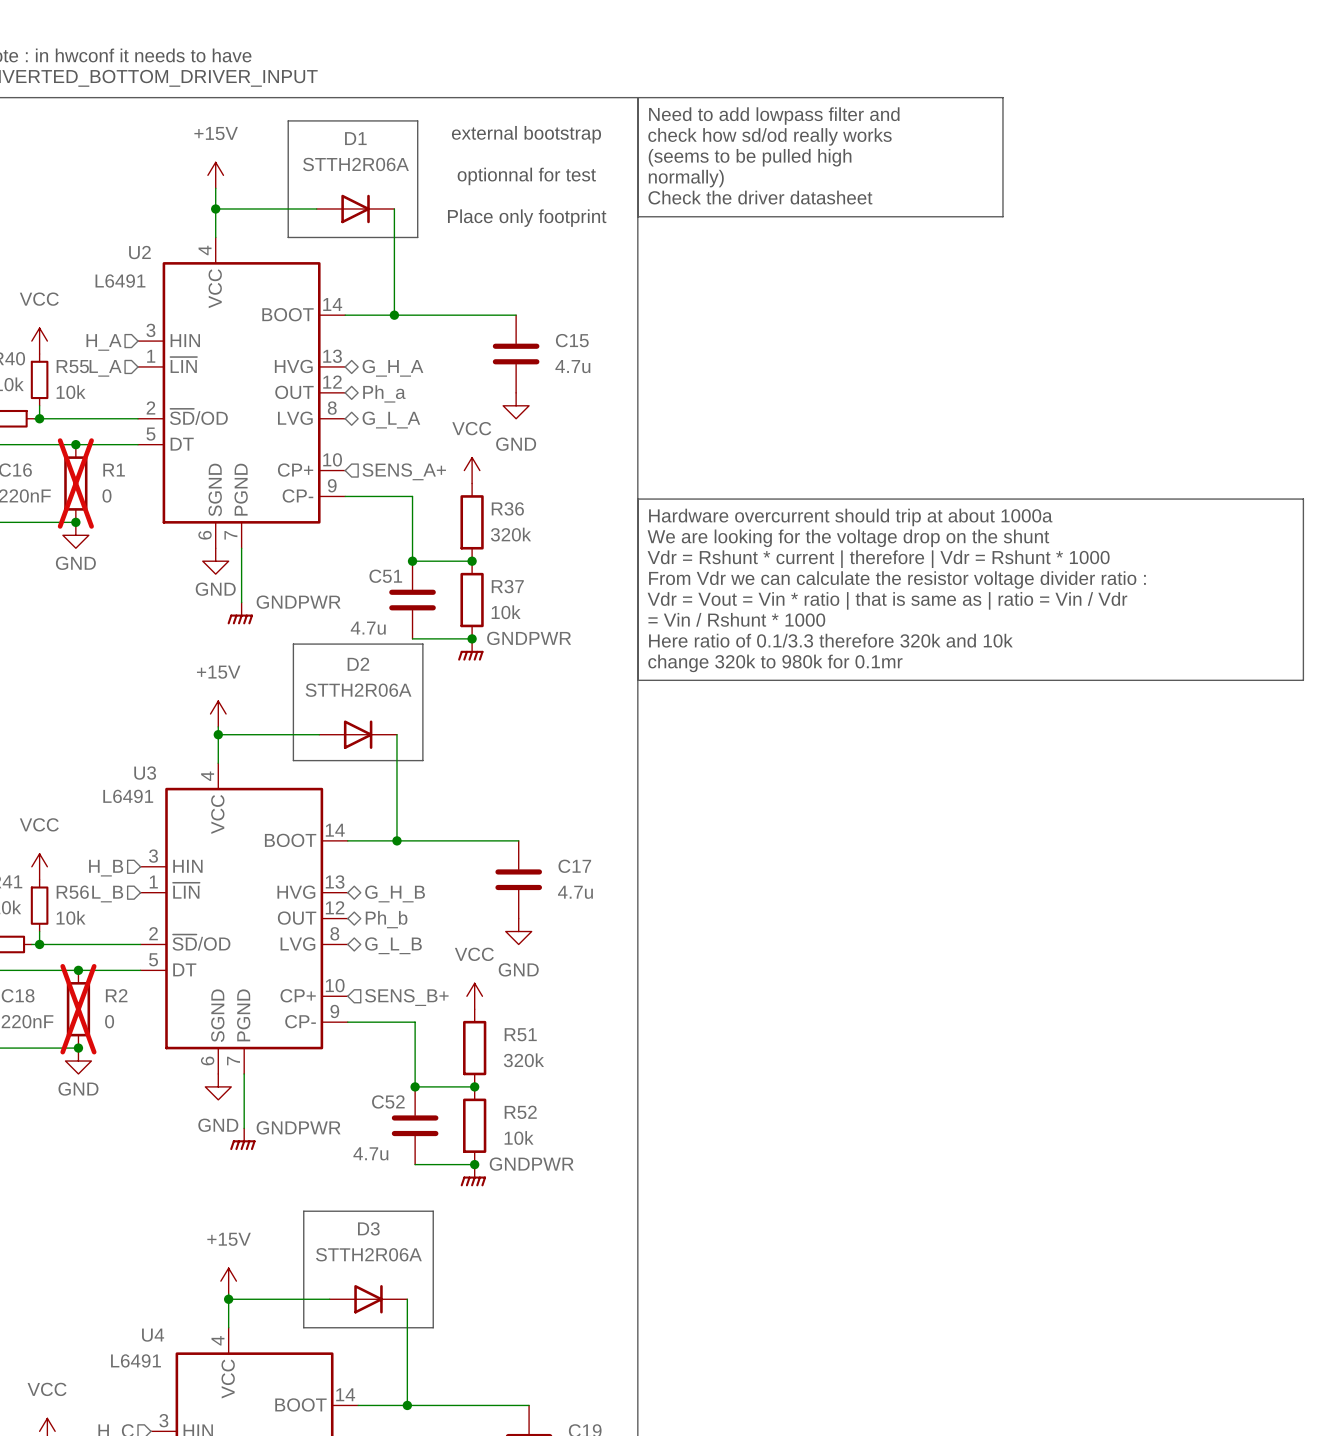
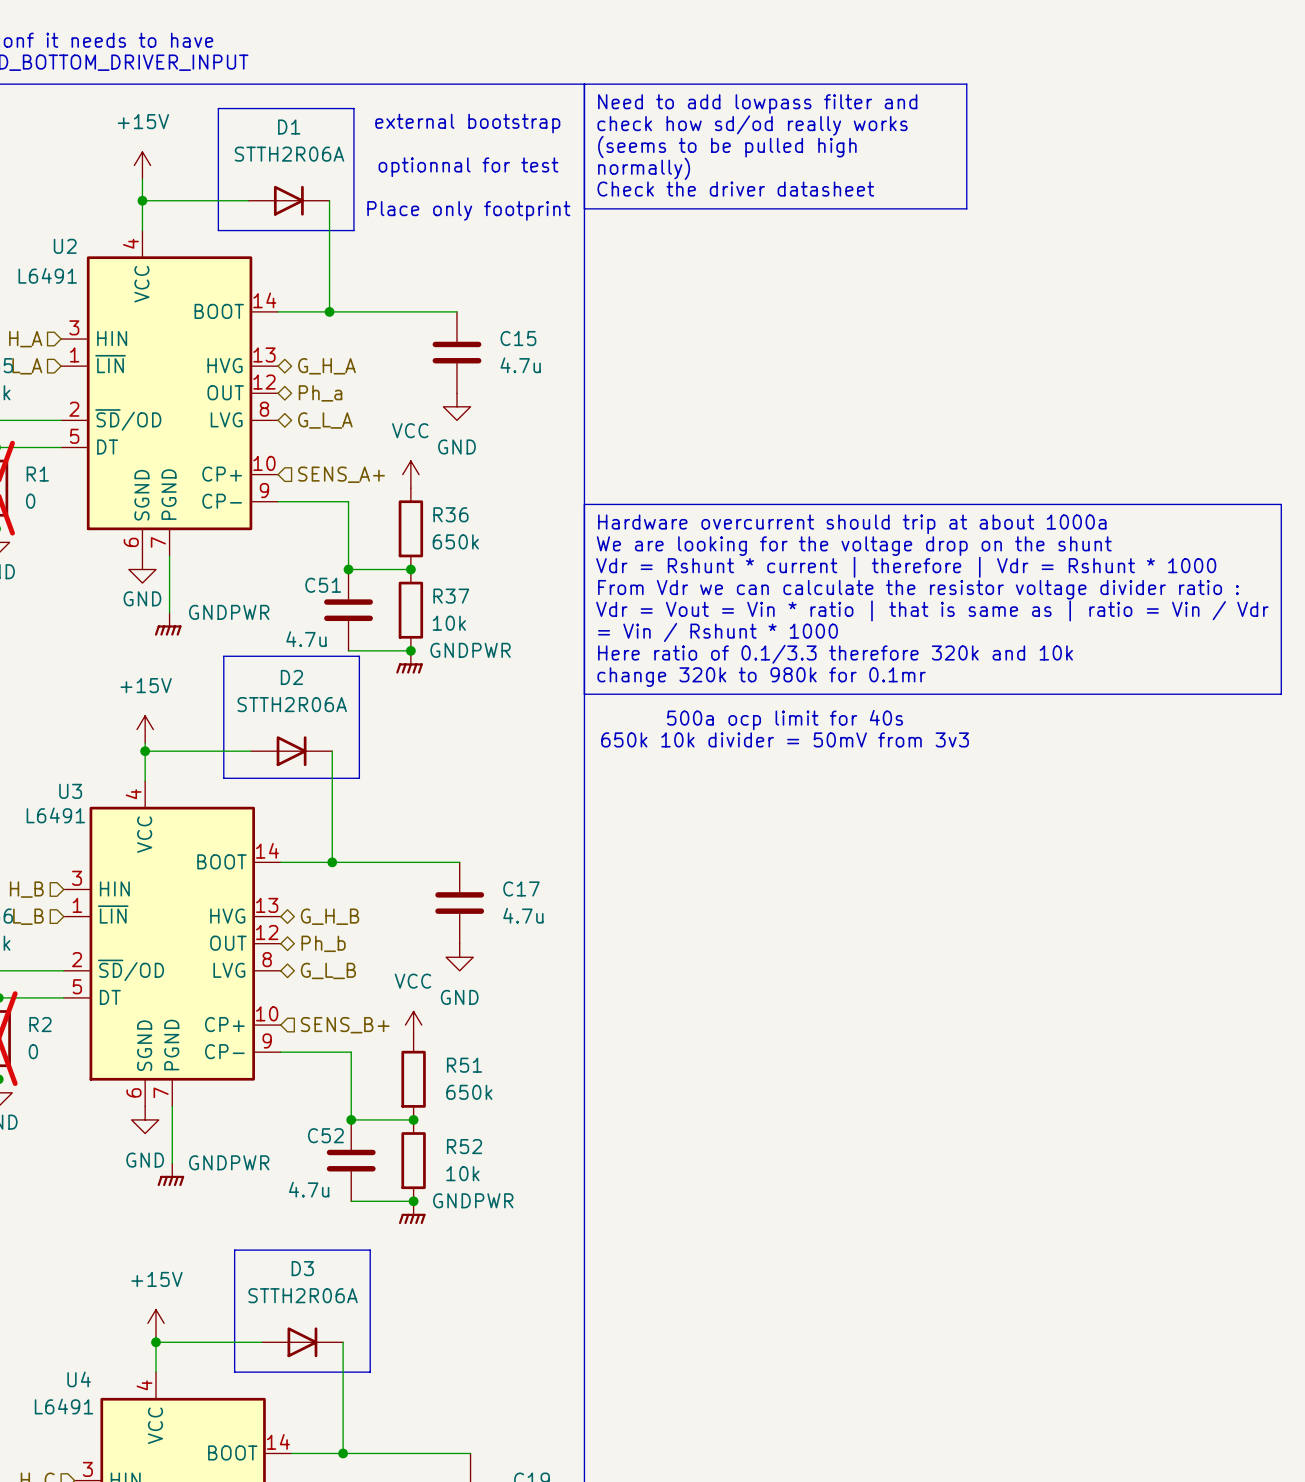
R36 value: 320k (510, 534) -> 650k (455, 541)
text: none -> 500a ocp limit for 40s (785, 720)
text: none -> 650k 10k divider = 50mV from 3v3 (785, 739)
R51 value: 320k (523, 1060) -> 650k (469, 1092)

